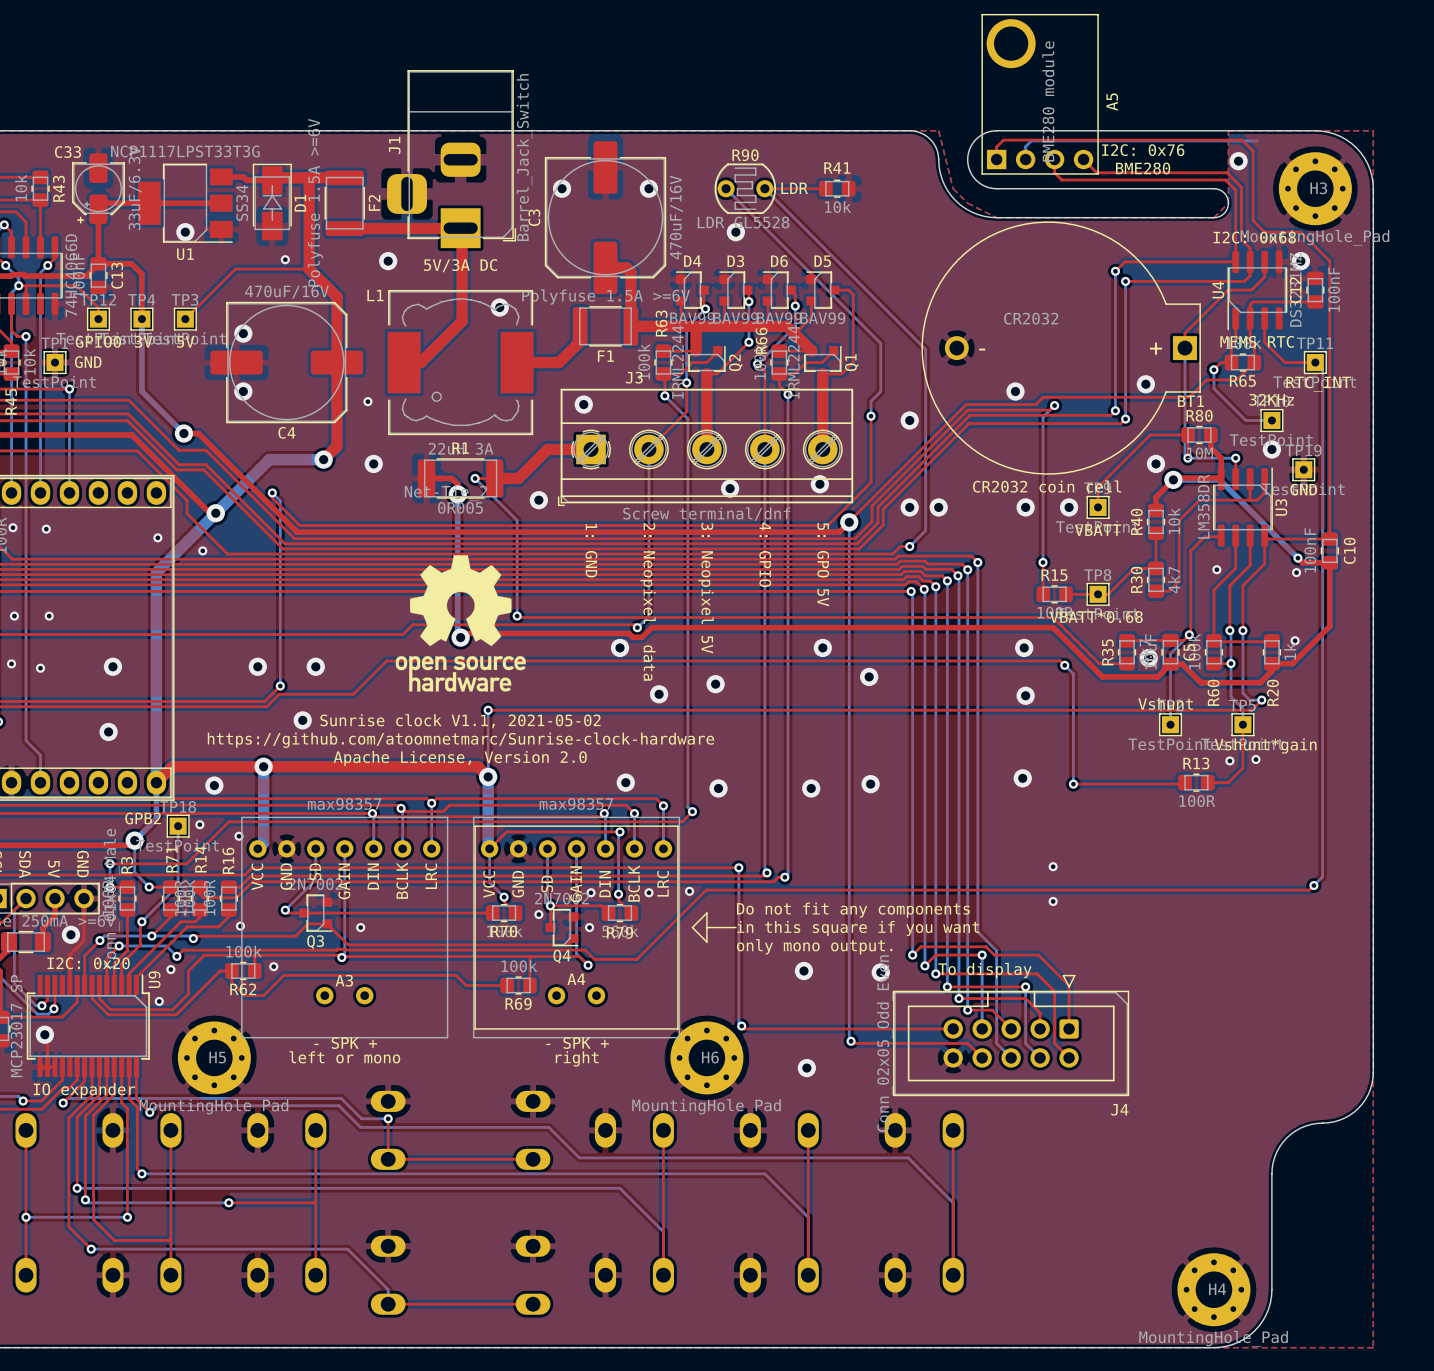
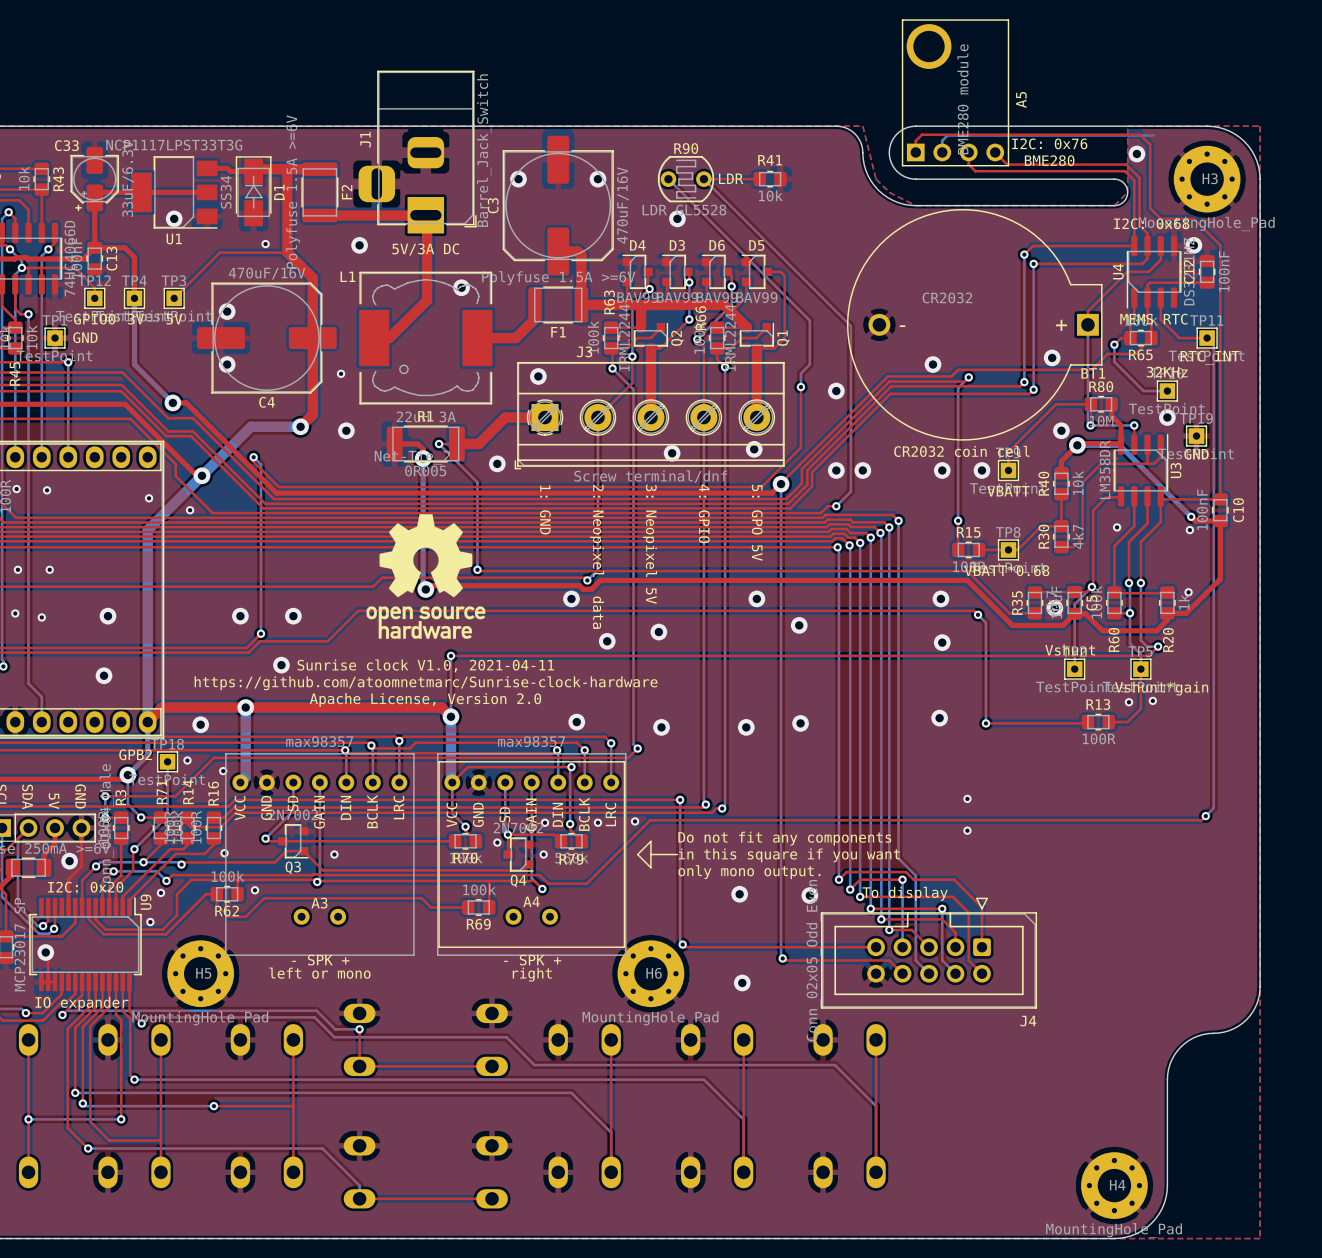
text: Sunrise clock V1.1, 2021-05-02 (460, 721) -> Sunrise clock V1.0, 2021-04-11 (425, 665)

